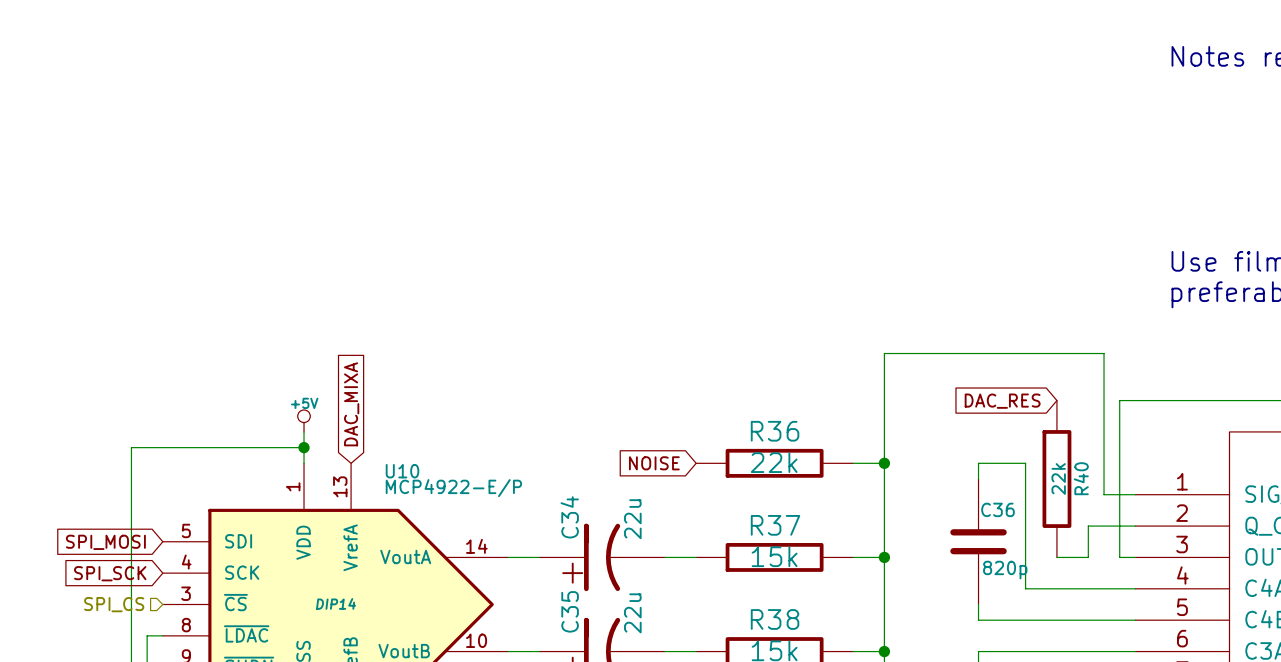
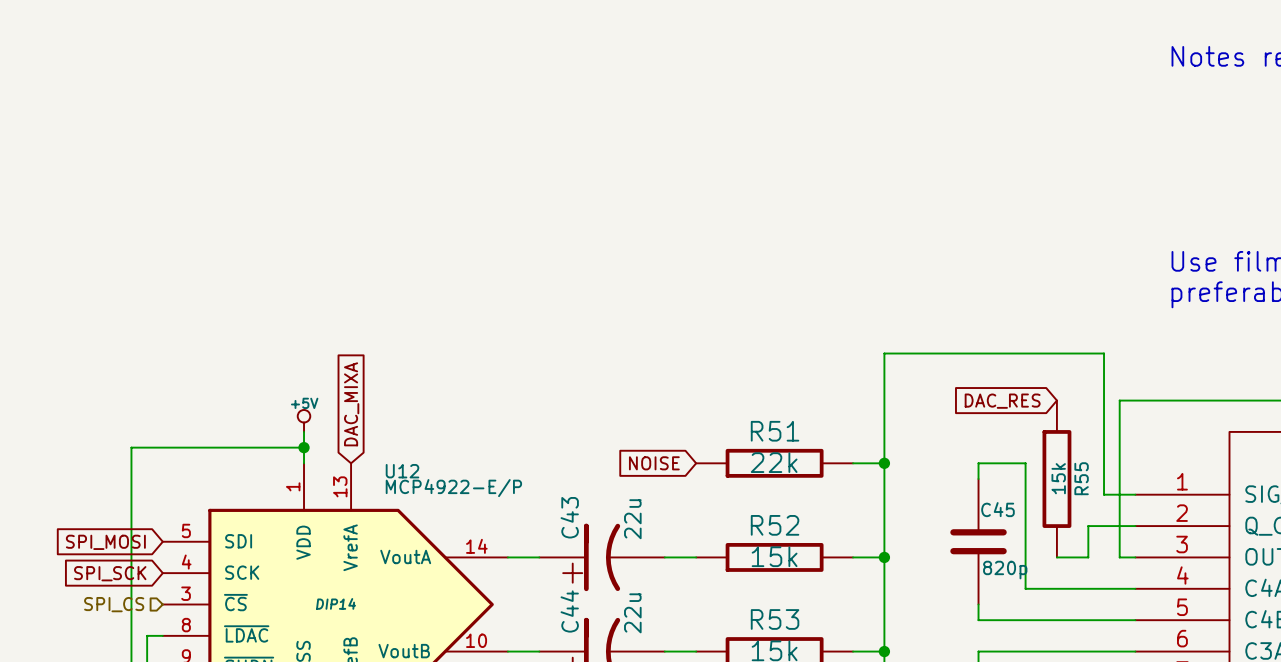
R36 name: R36 (775, 431) -> R51 (775, 431)
U10 name: U10 (402, 471) -> U12 (402, 471)
R40 value: 22k (1058, 478) -> 15k (1058, 478)
R40 name: R40 (1081, 478) -> R55 (1081, 478)
C36 name: C36 (997, 509) -> C45 (997, 509)
C34 name: C34 (569, 517) -> C43 (569, 517)
R37 name: R37 (775, 525) -> R52 (775, 525)
C35 name: C35 (570, 611) -> C44 (569, 611)
R38 name: R38 (775, 619) -> R53 (775, 619)

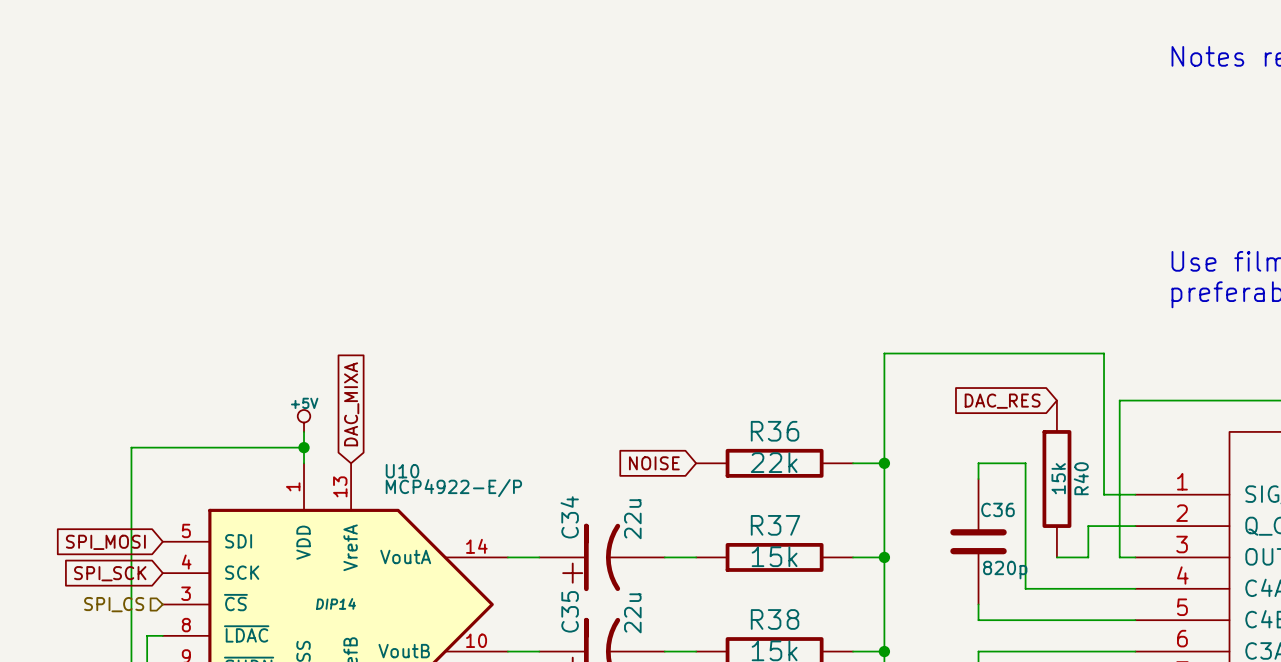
R51 name: R51 (775, 431) -> R36 (775, 431)
U12 name: U12 (402, 471) -> U10 (402, 471)
R55 name: R55 (1081, 478) -> R40 (1081, 478)
C45 name: C45 (997, 509) -> C36 (997, 509)
C43 name: C43 (569, 517) -> C34 (569, 517)
R52 name: R52 (775, 525) -> R37 (775, 525)
C44 name: C44 (569, 611) -> C35 (570, 611)
R53 name: R53 (775, 619) -> R38 (775, 619)

